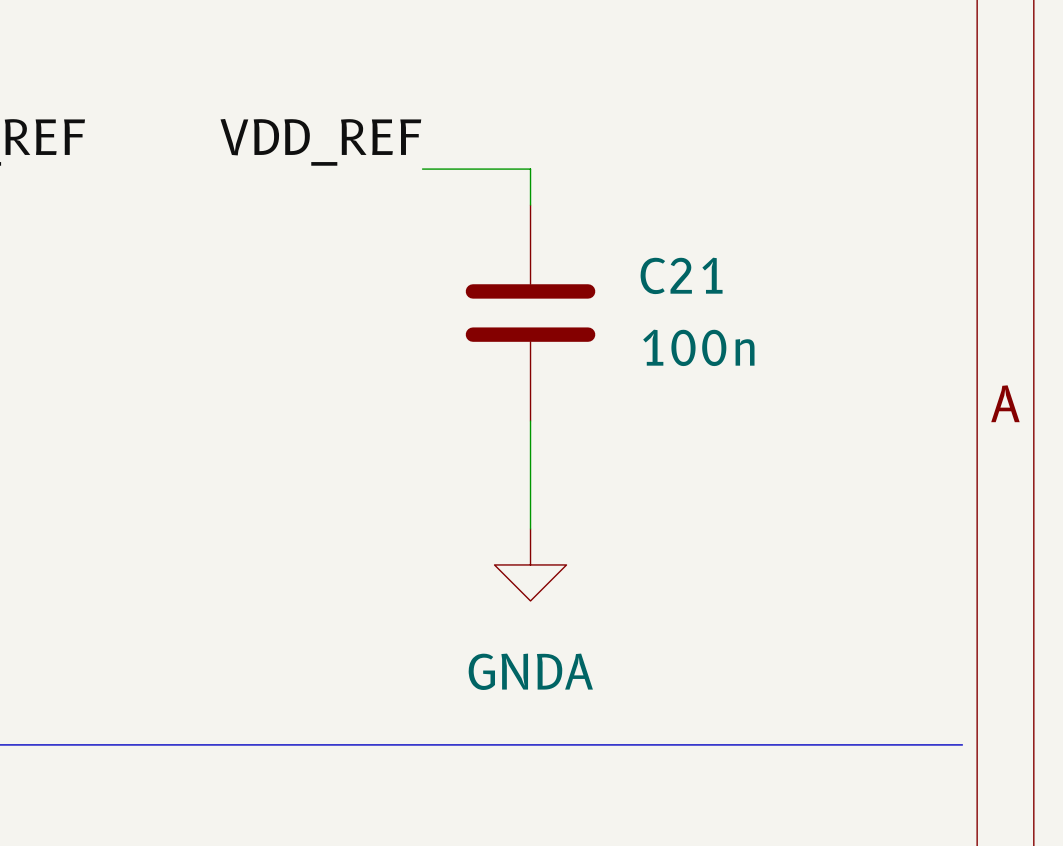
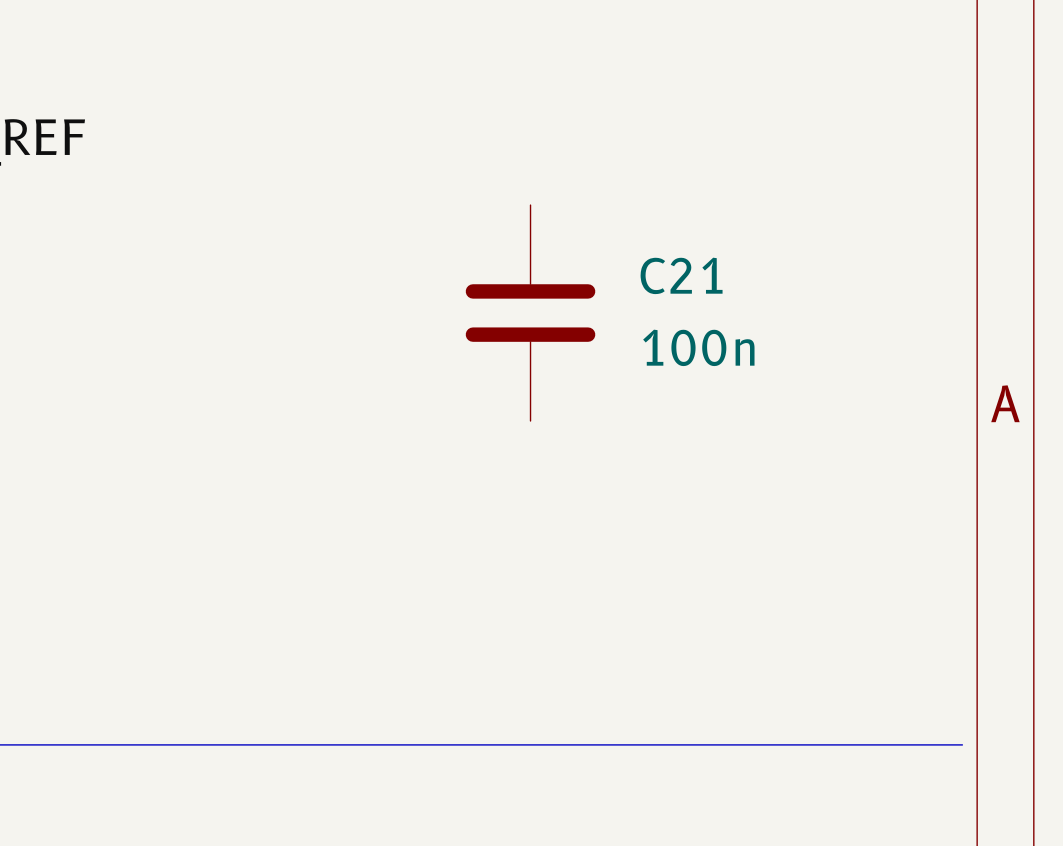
label: VDD_REF (320, 142) -> none
wire: (422, 169) (530, 169) (530, 205) -> none
wire: (530, 421) (530, 528) -> none
power symbol: GNDA (530, 564) -> none

